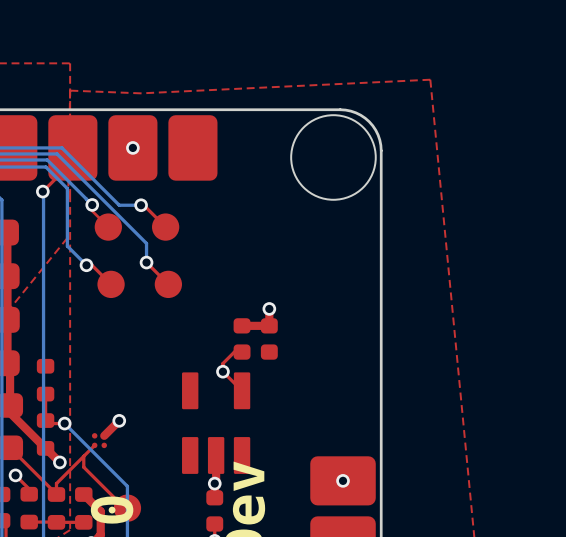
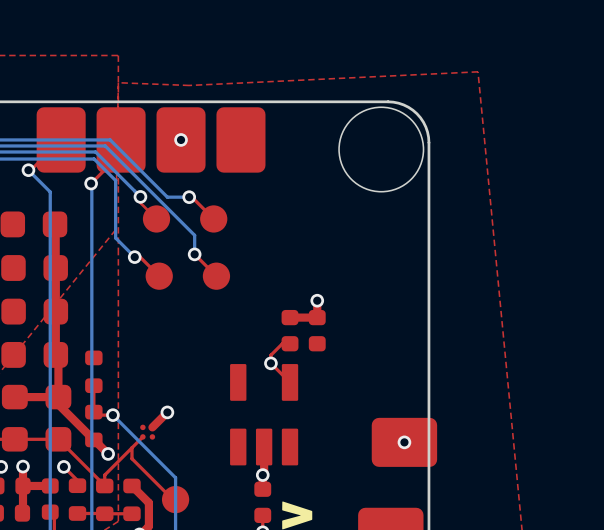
part position: (343, 480) -> (404, 442)
via position: (343, 480) -> (404, 442)

